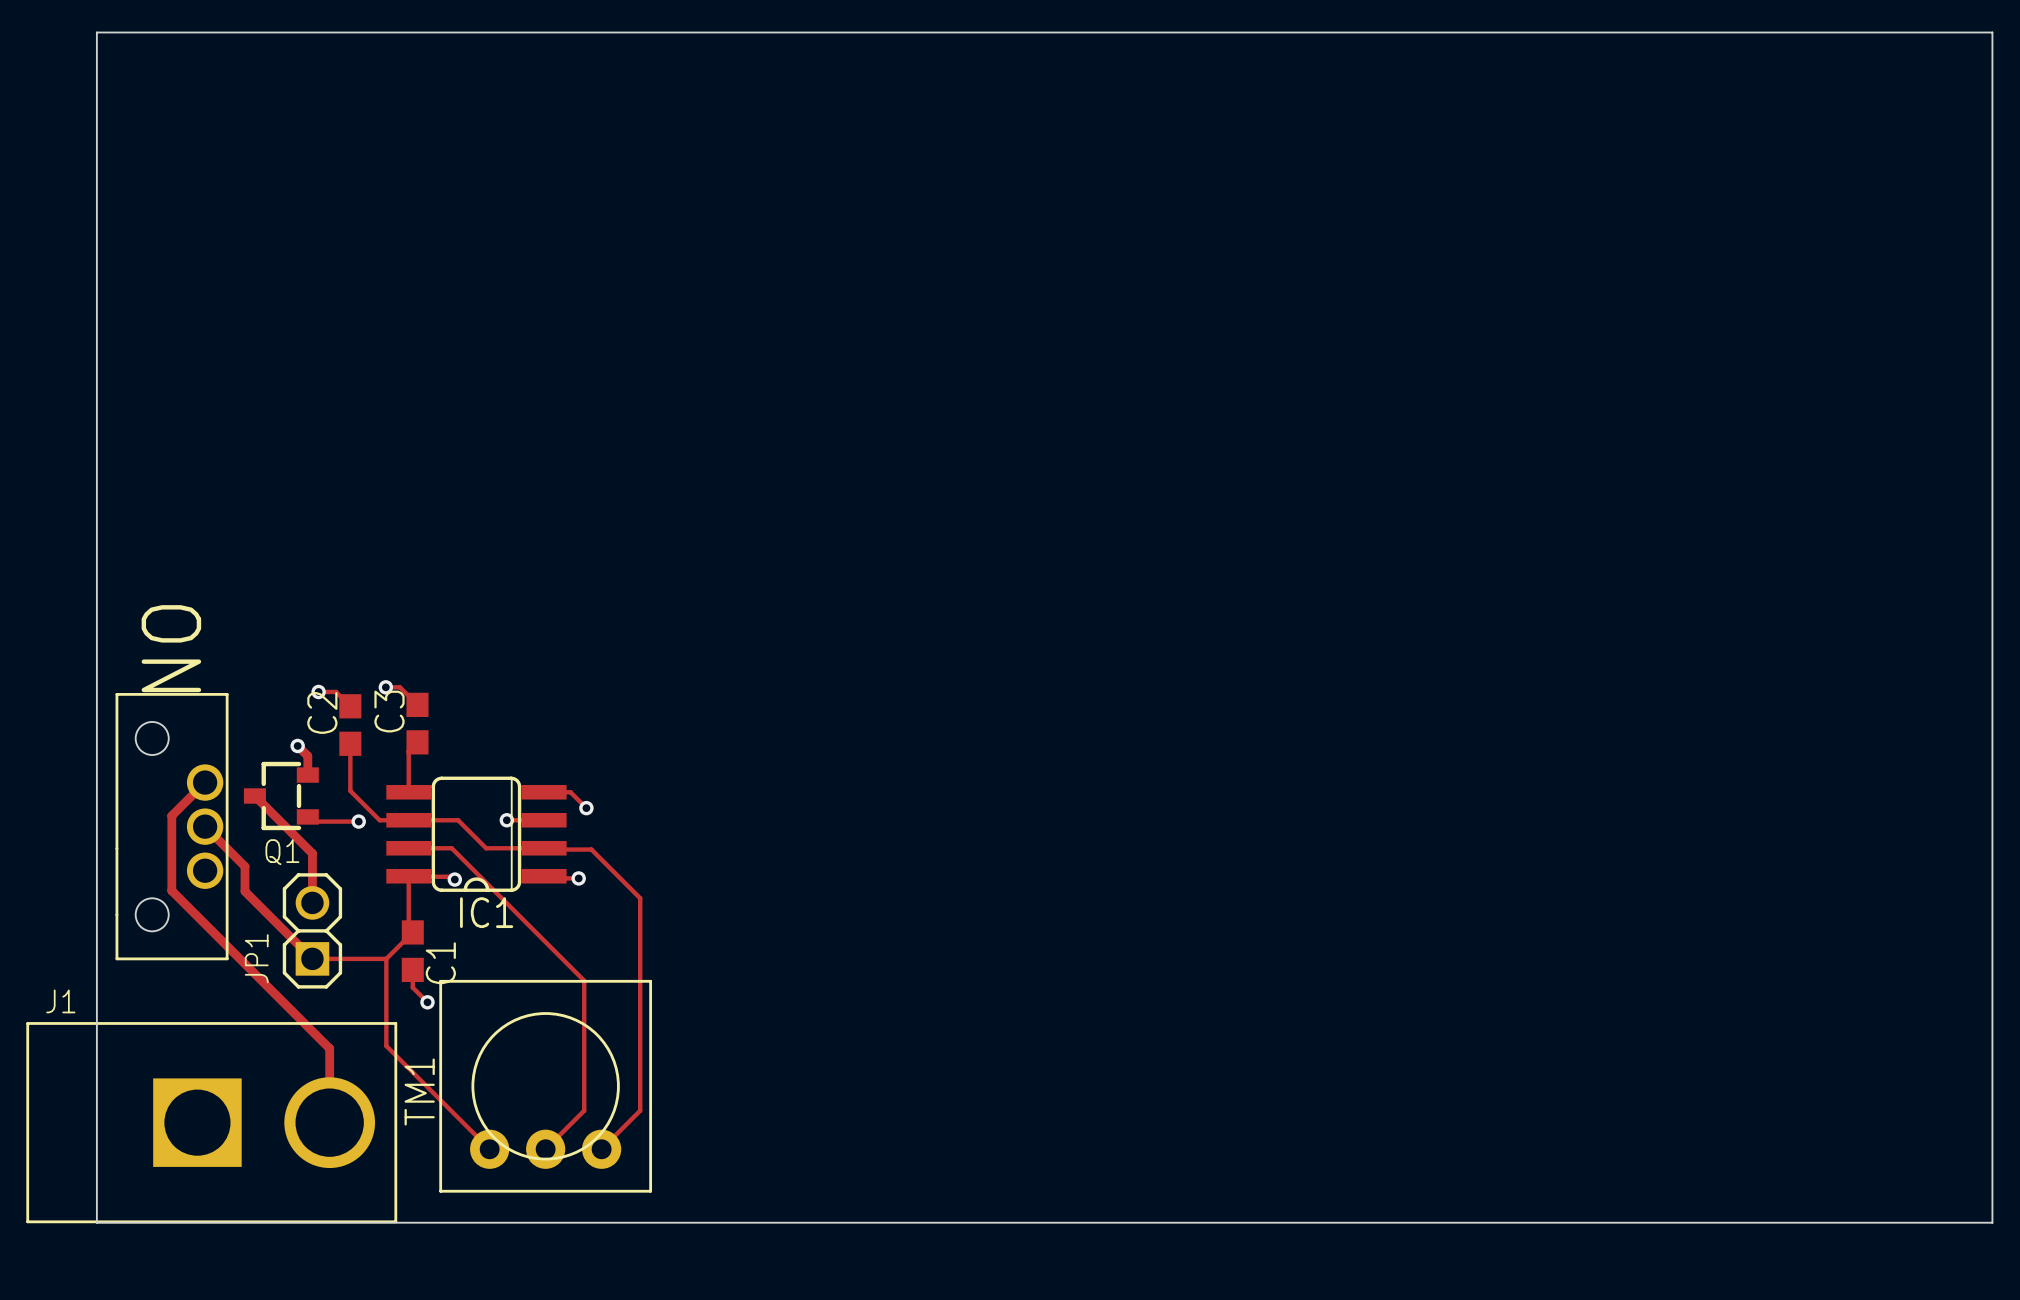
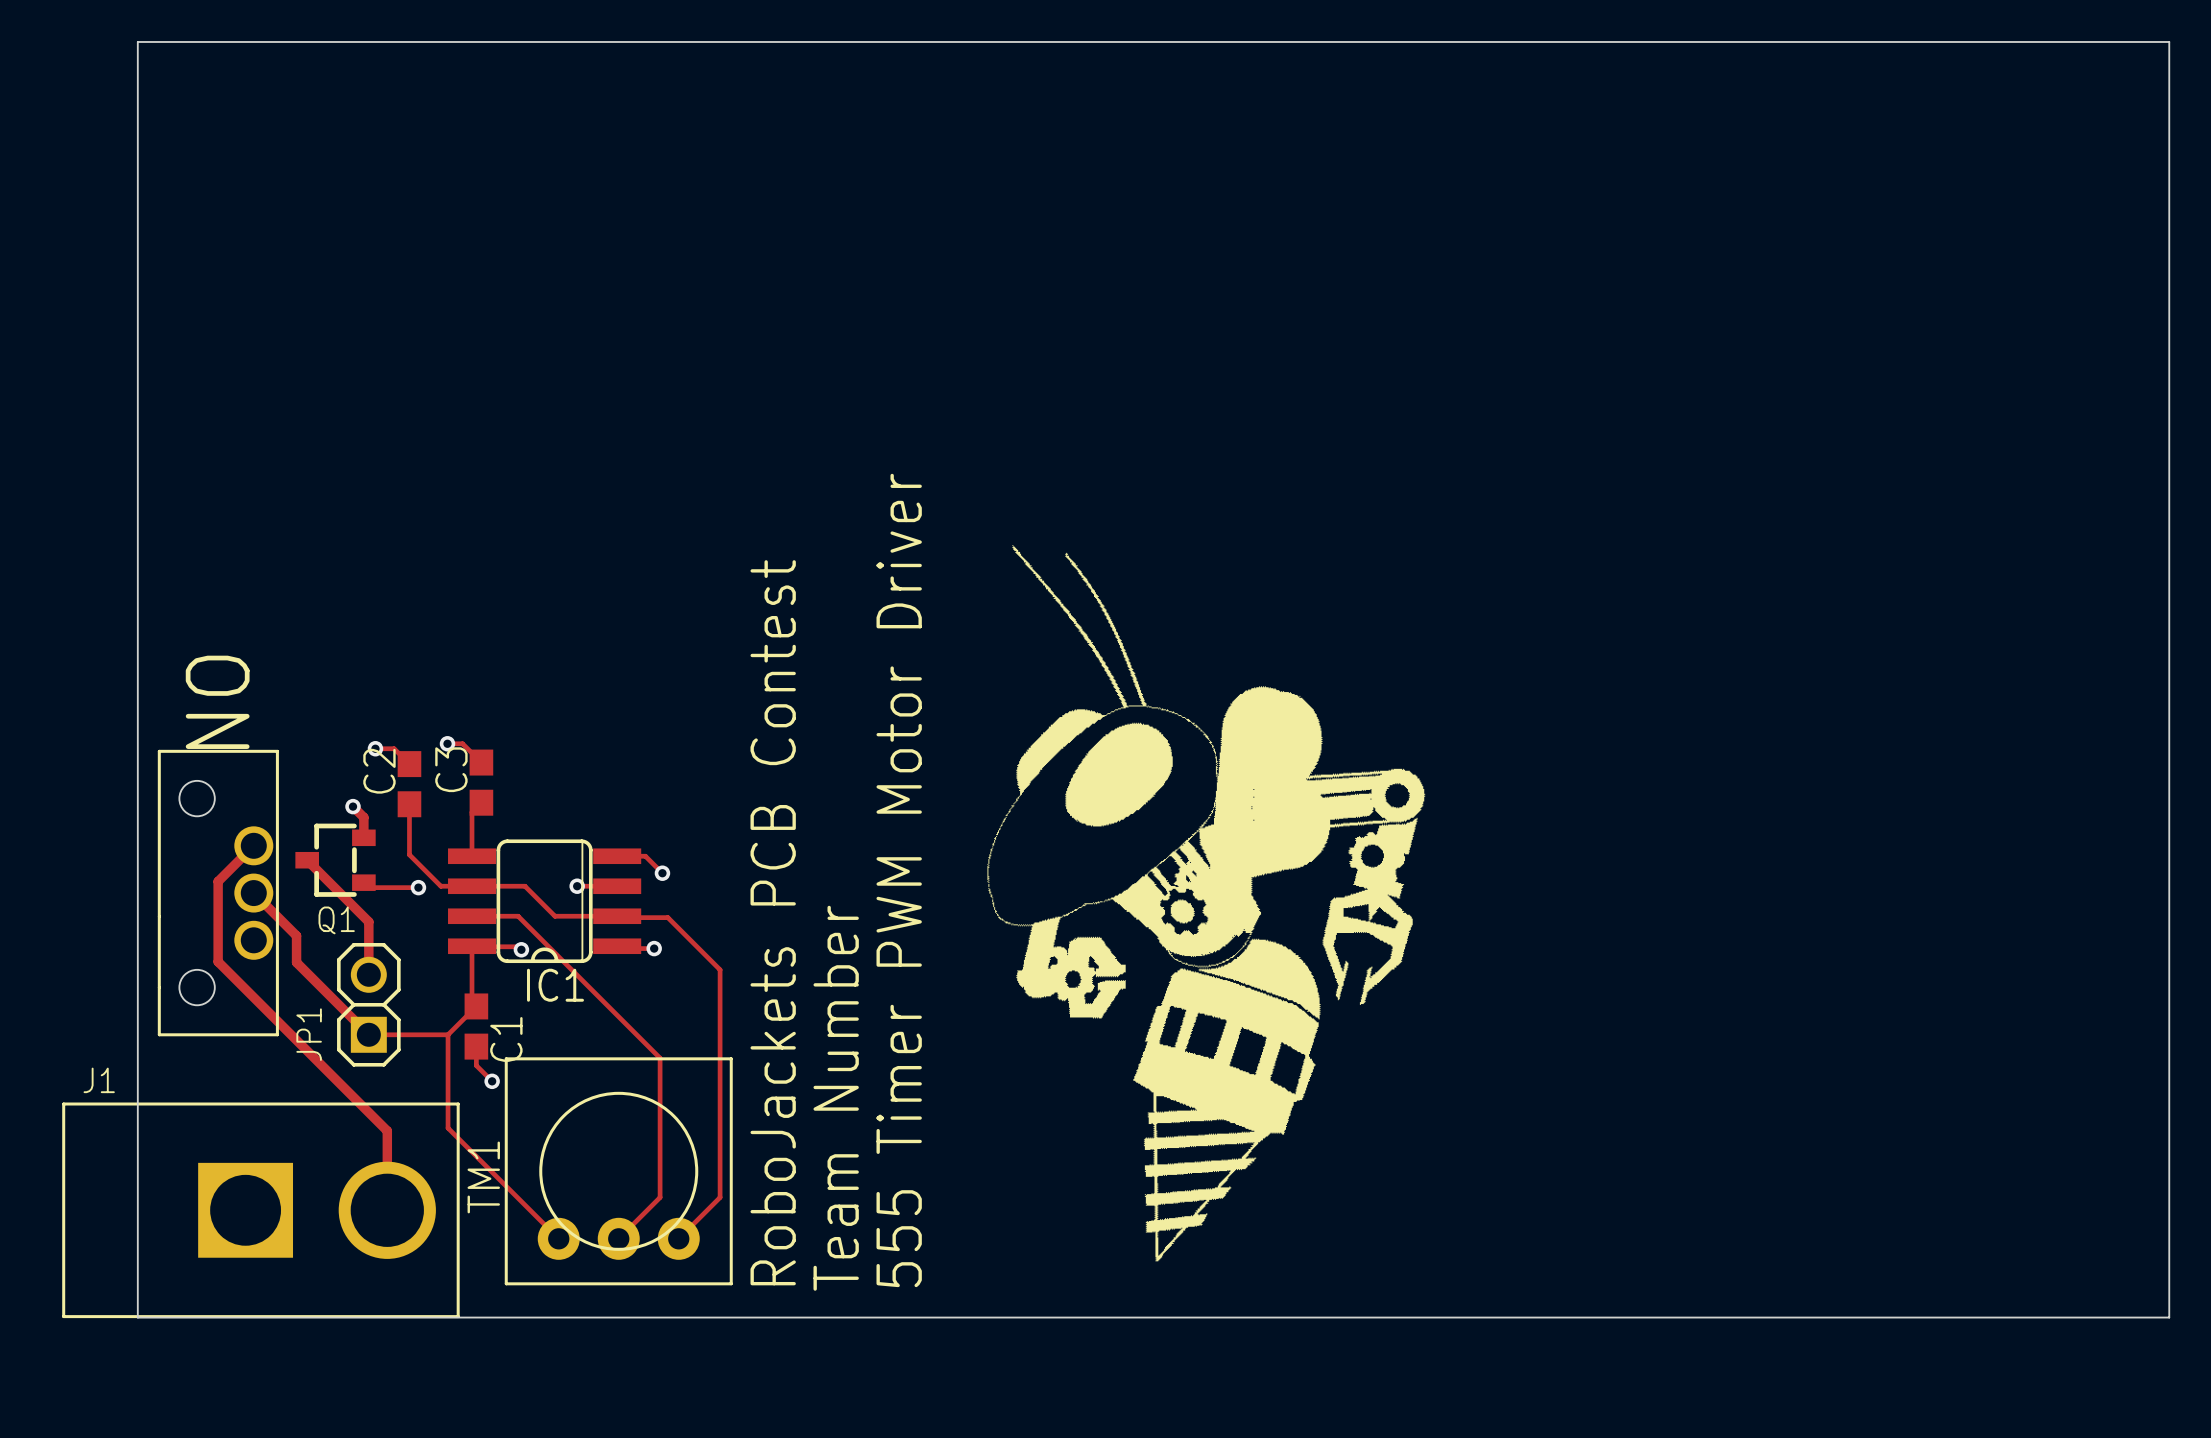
drawing: none -> [987, 545, 1426, 1262]
text: none -> 555 Timer PWM Motor Driver (899, 880)
text: none -> RoboJackets PCB Contest (773, 922)
text: none -> Team Number (836, 1098)

